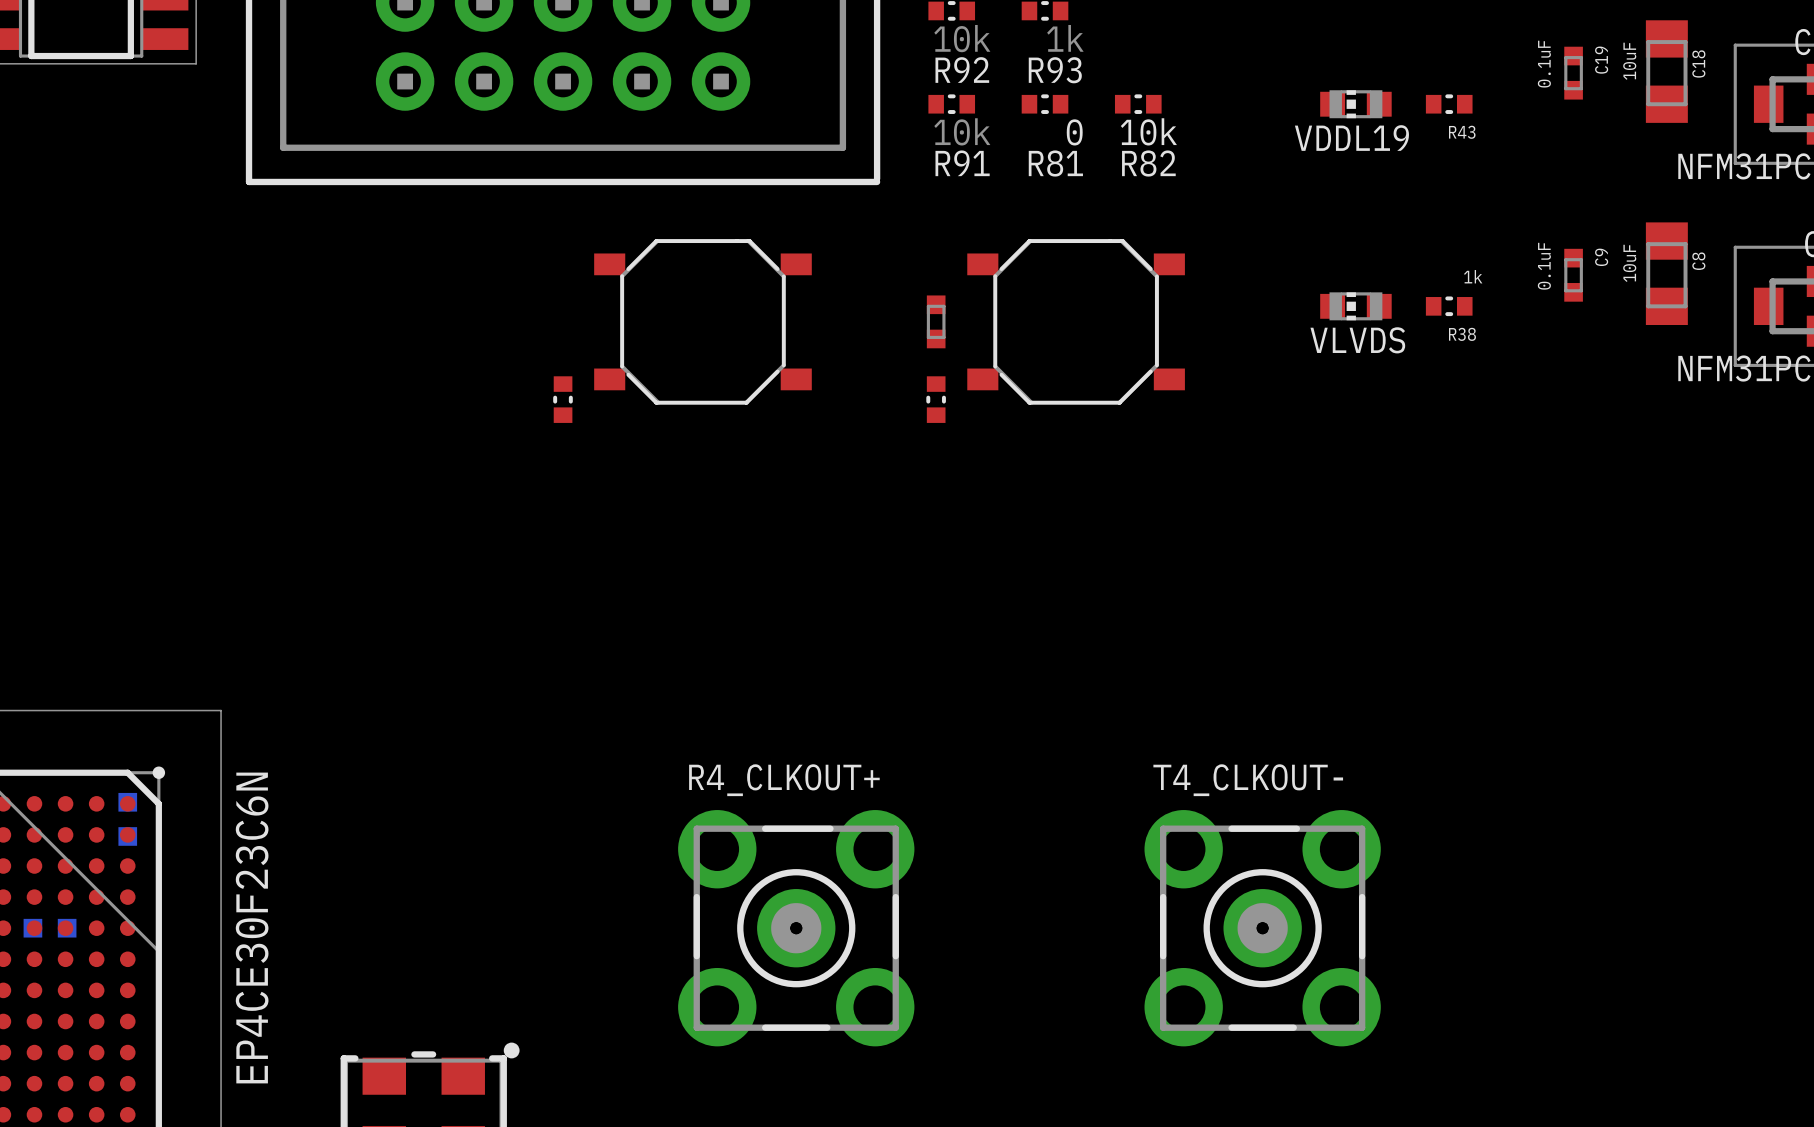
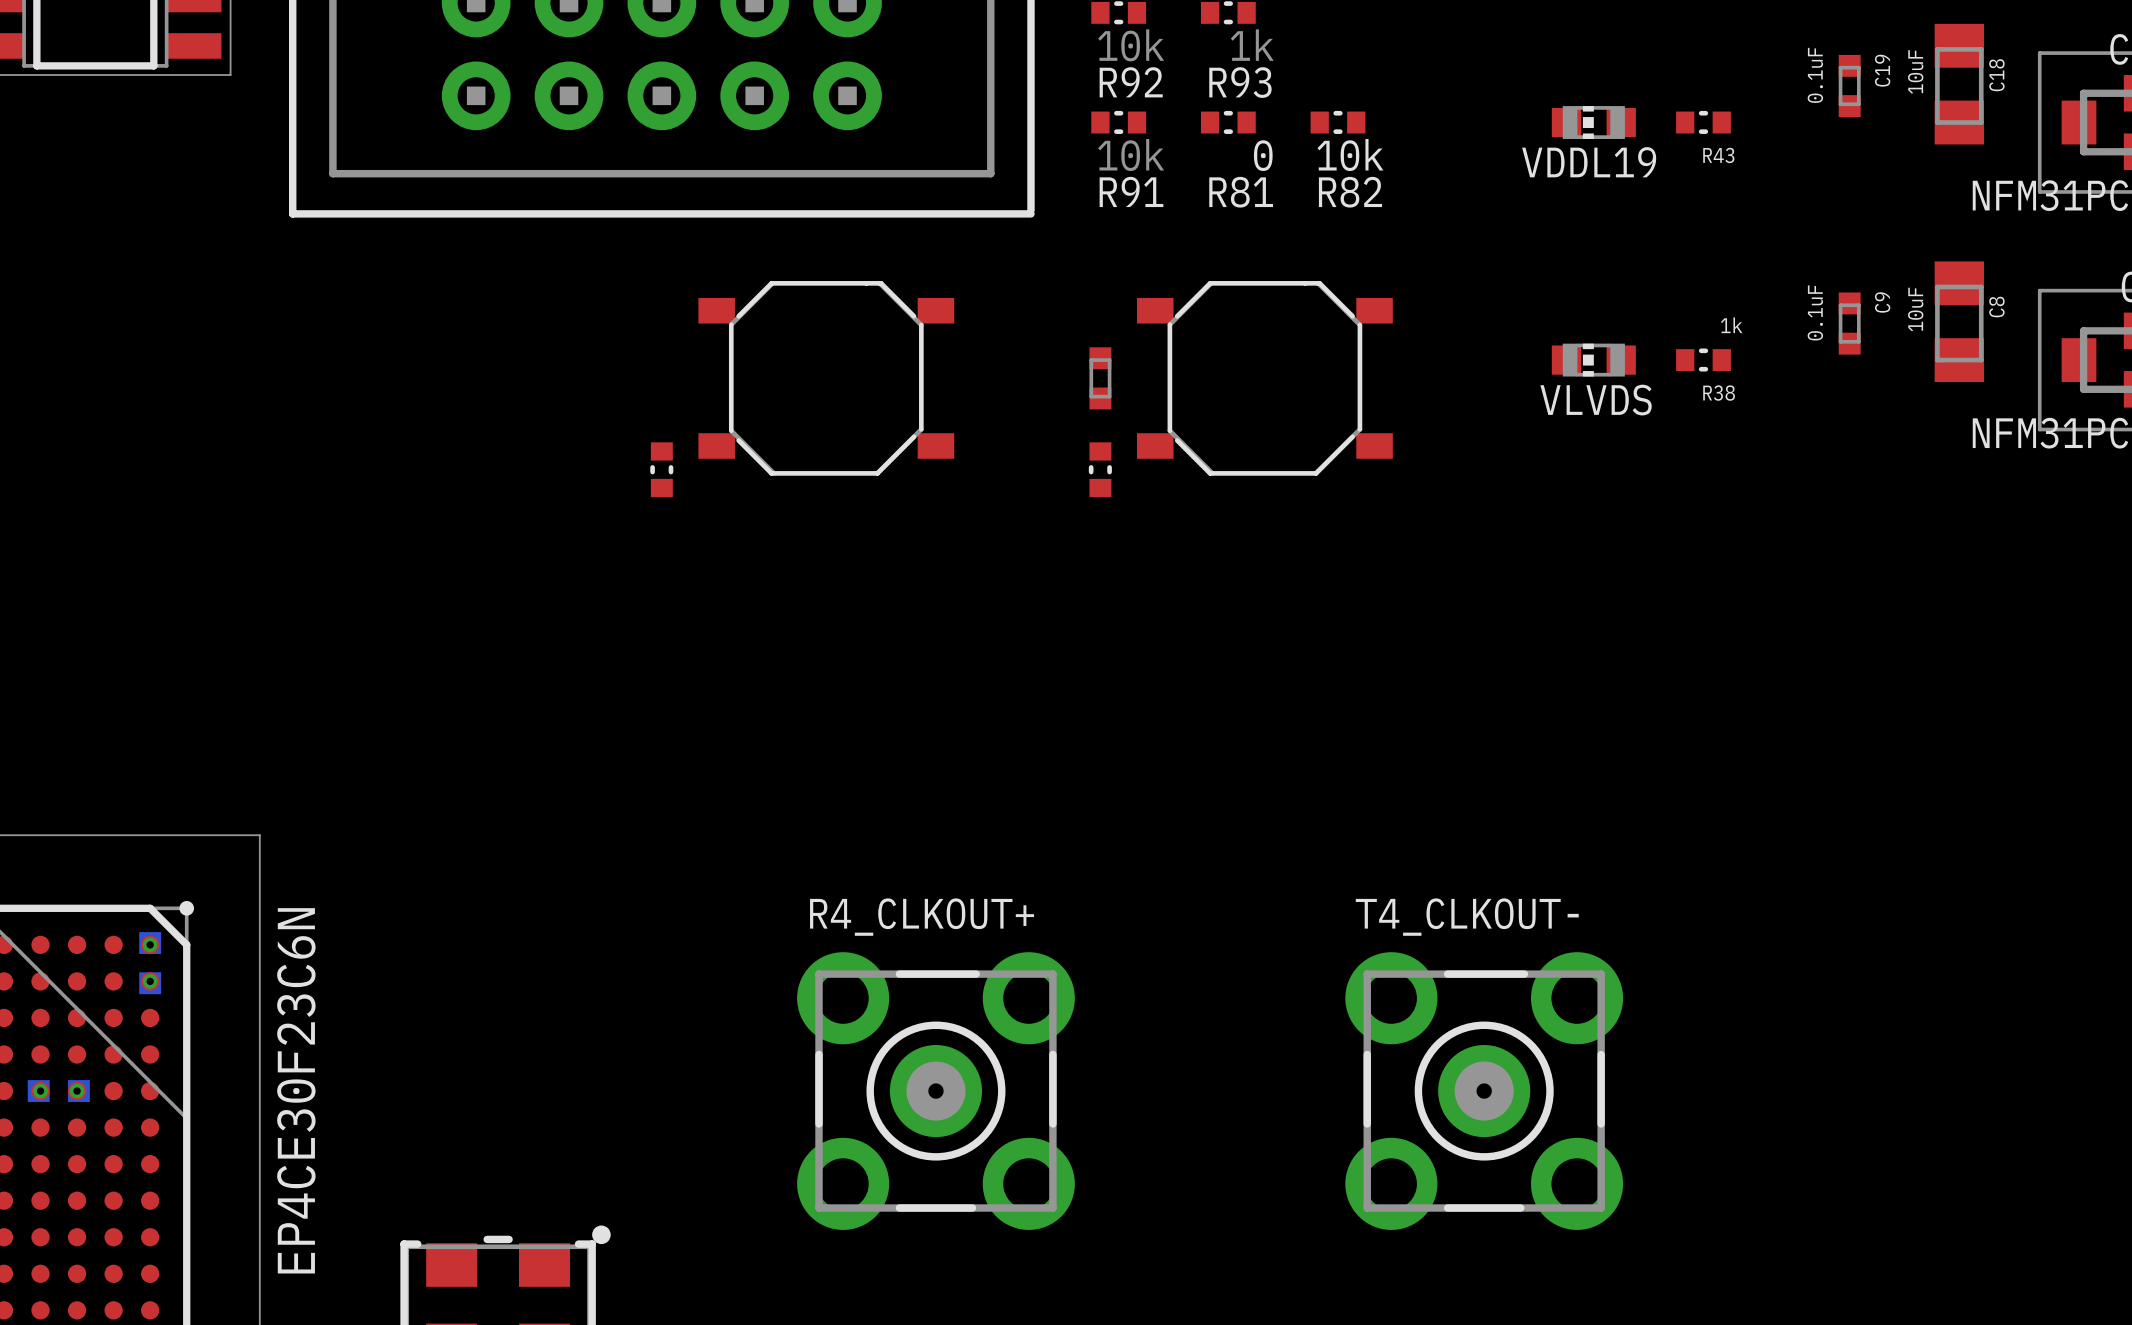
via: none -> (150, 944)
via: none -> (150, 981)
via: none -> (40, 1091)
via: none -> (77, 1091)

